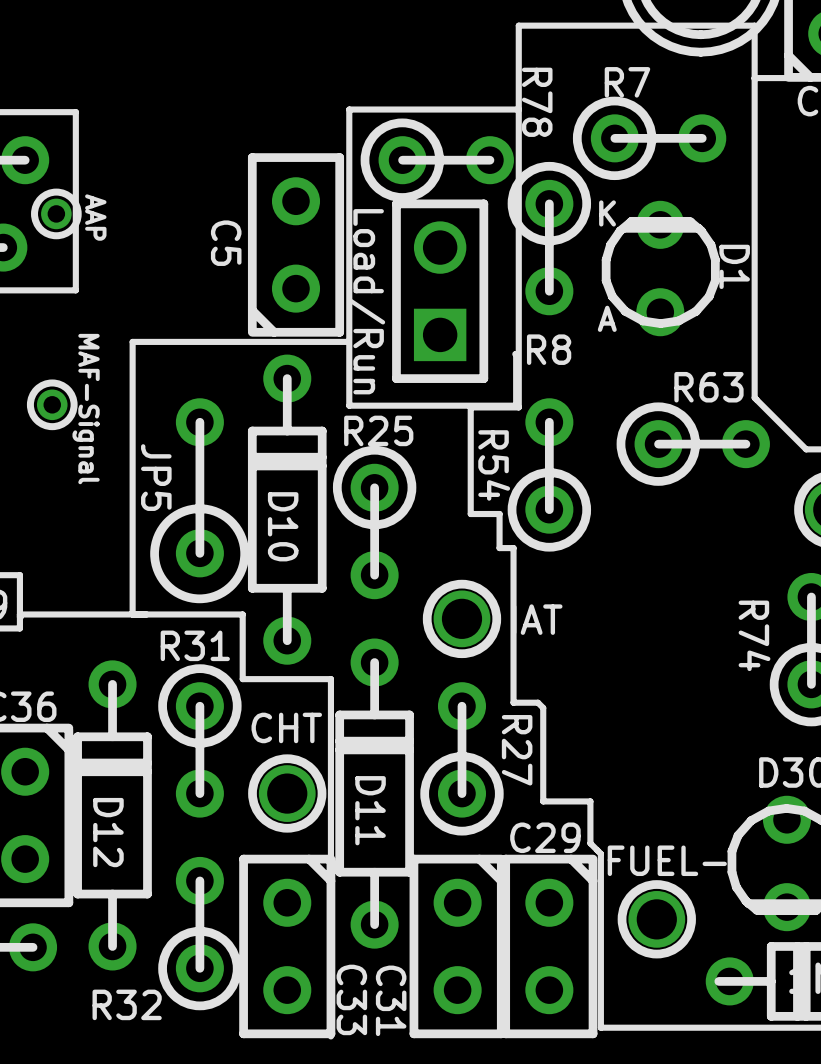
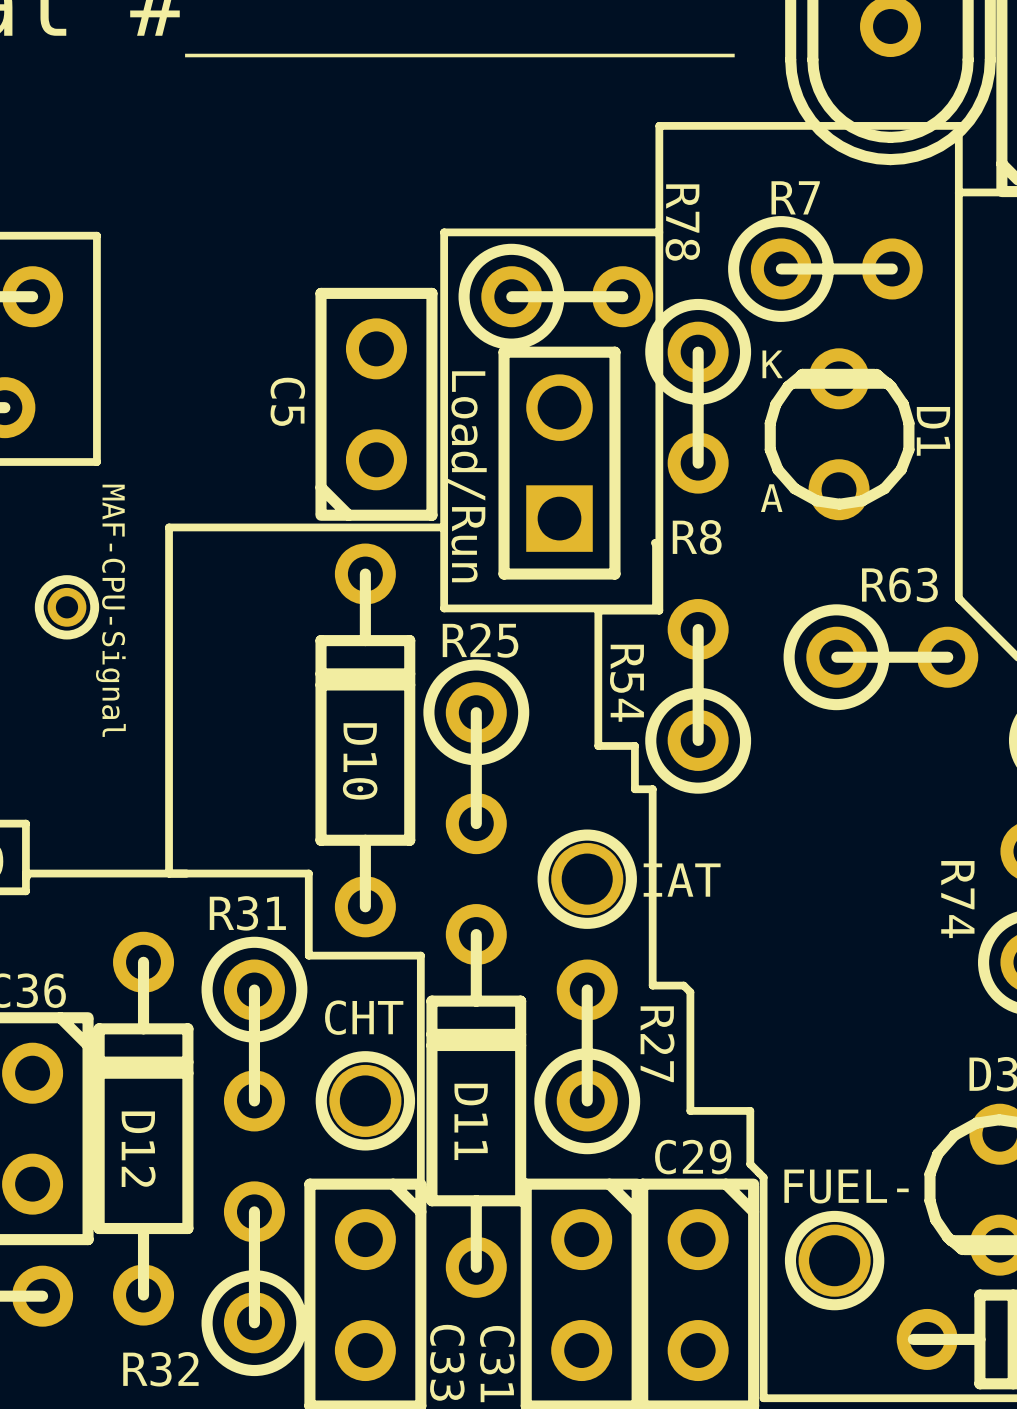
part: AAP (56, 213) -> none
part value: MAF-Signal (86, 409) -> MAF-CPU-Signal (110, 610)
JP5: (199, 500) -> none

